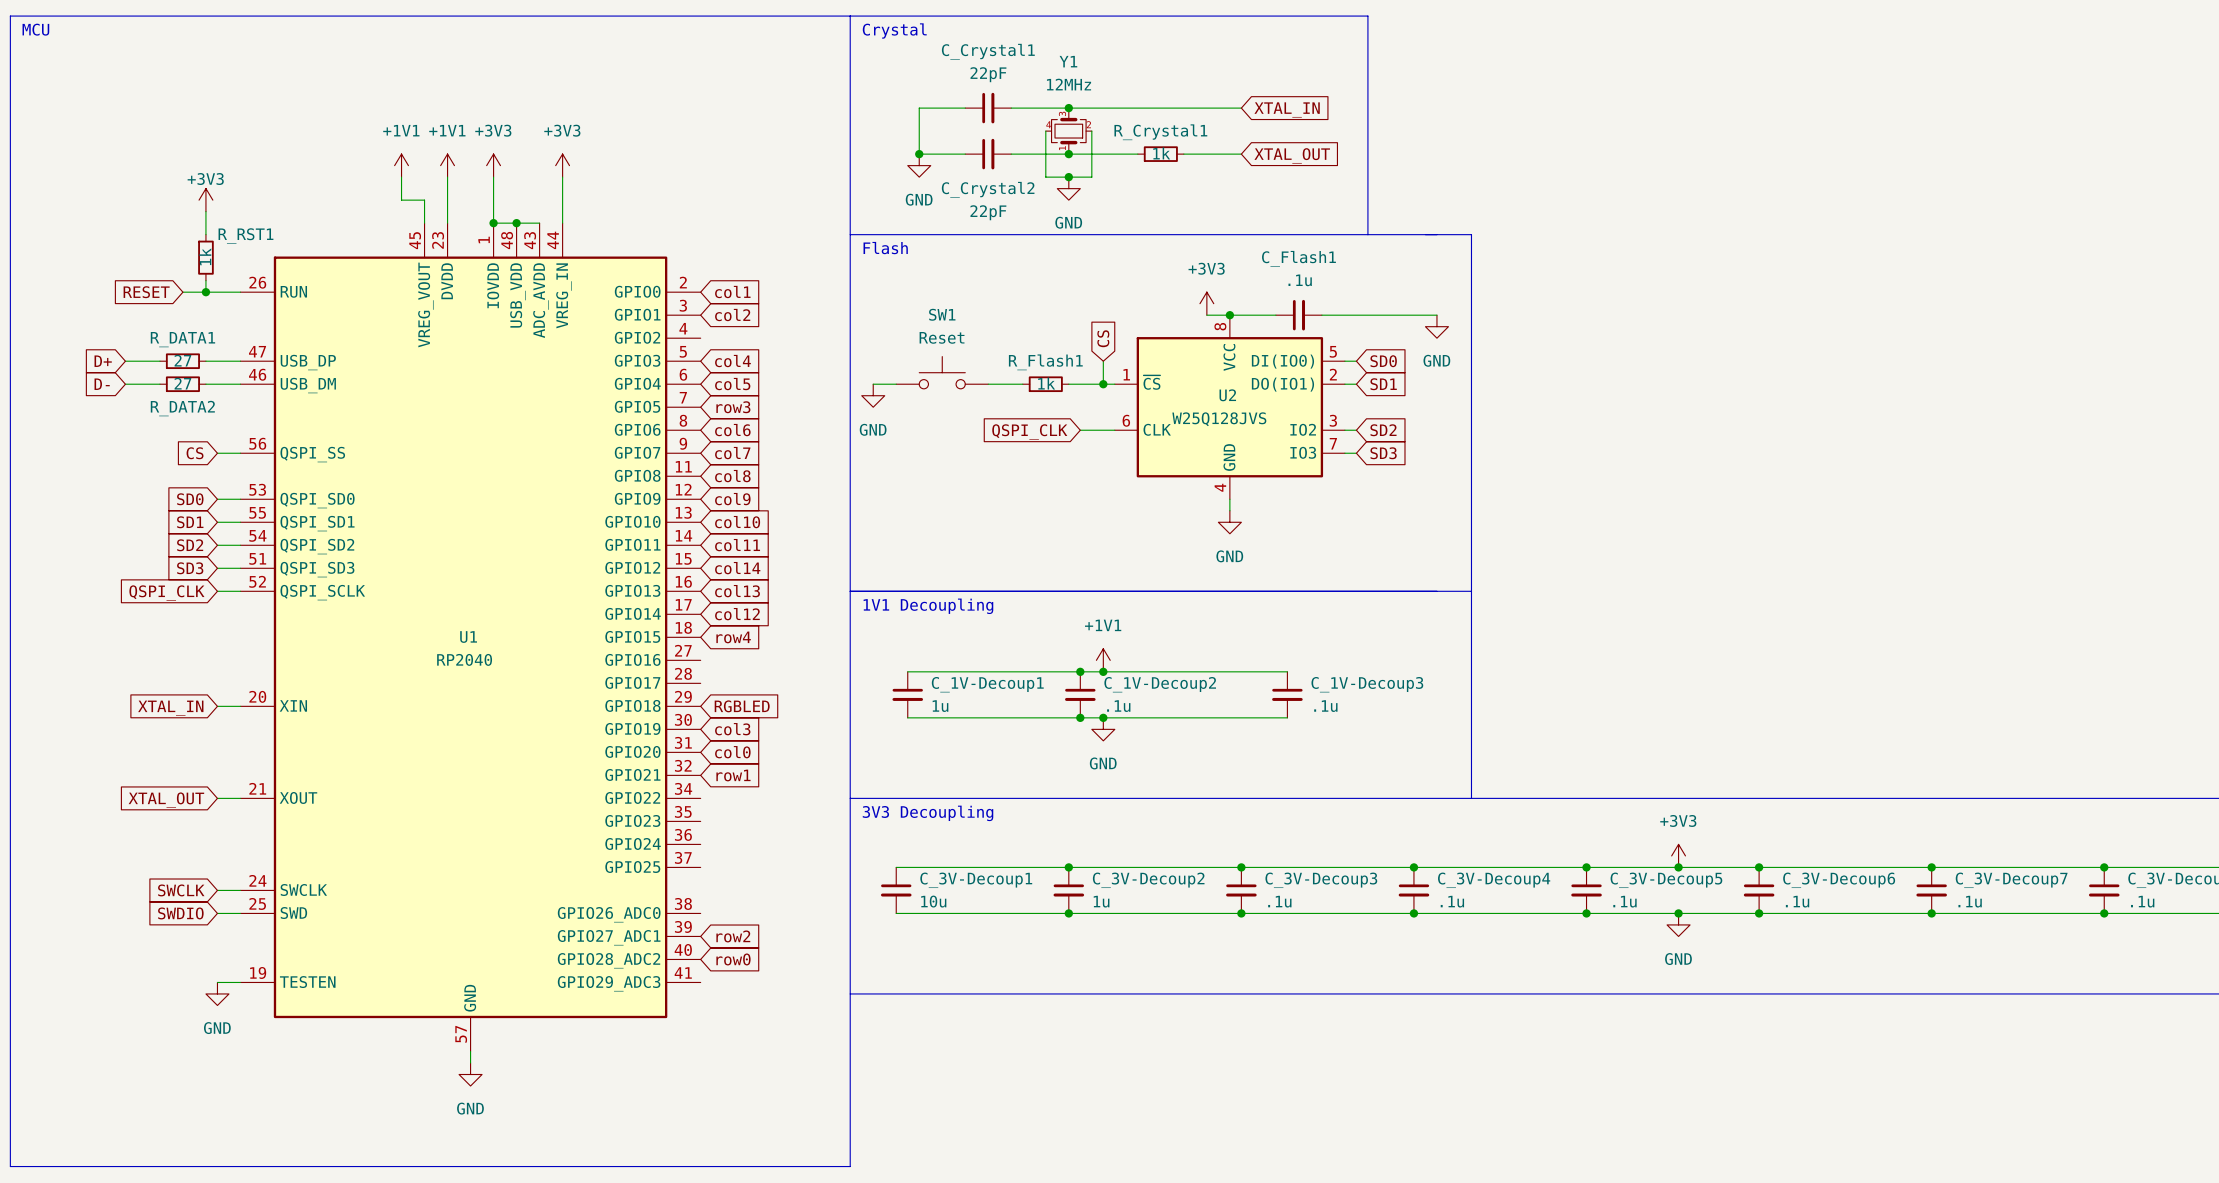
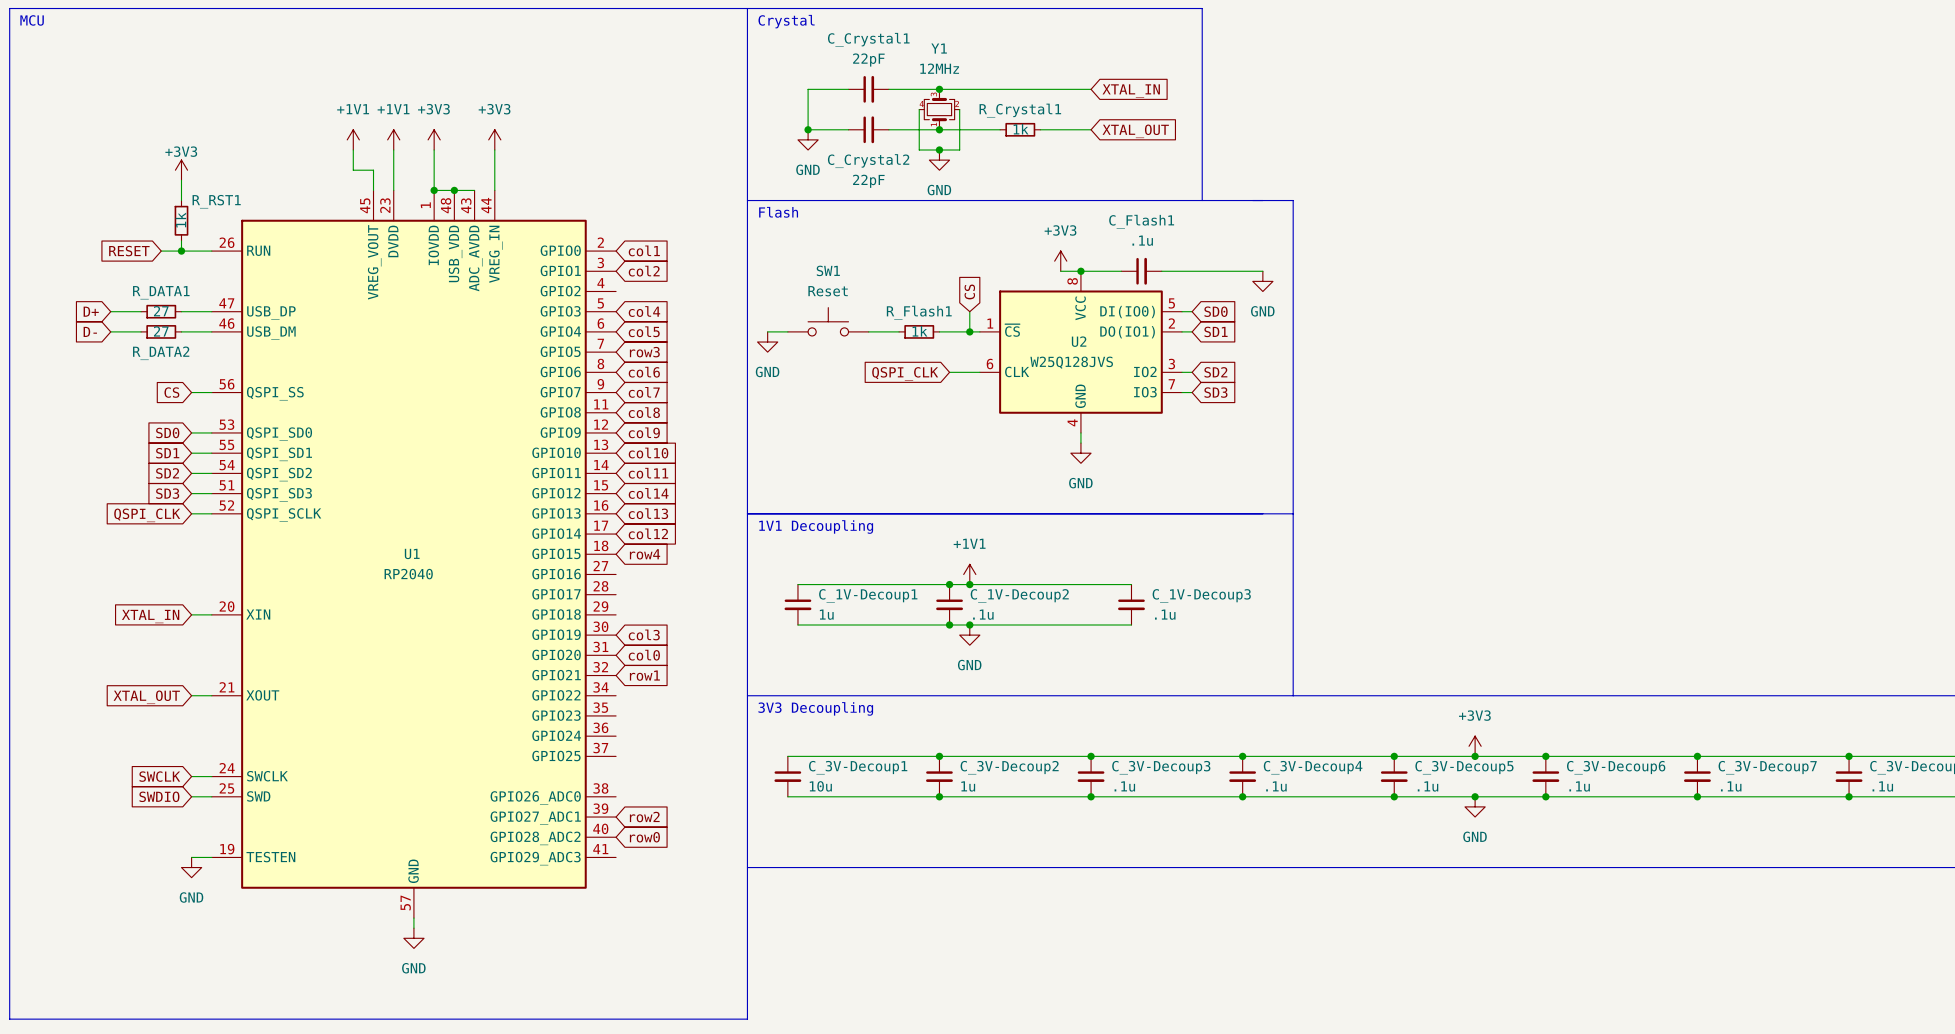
global label: RGBLED (742, 706) -> none

